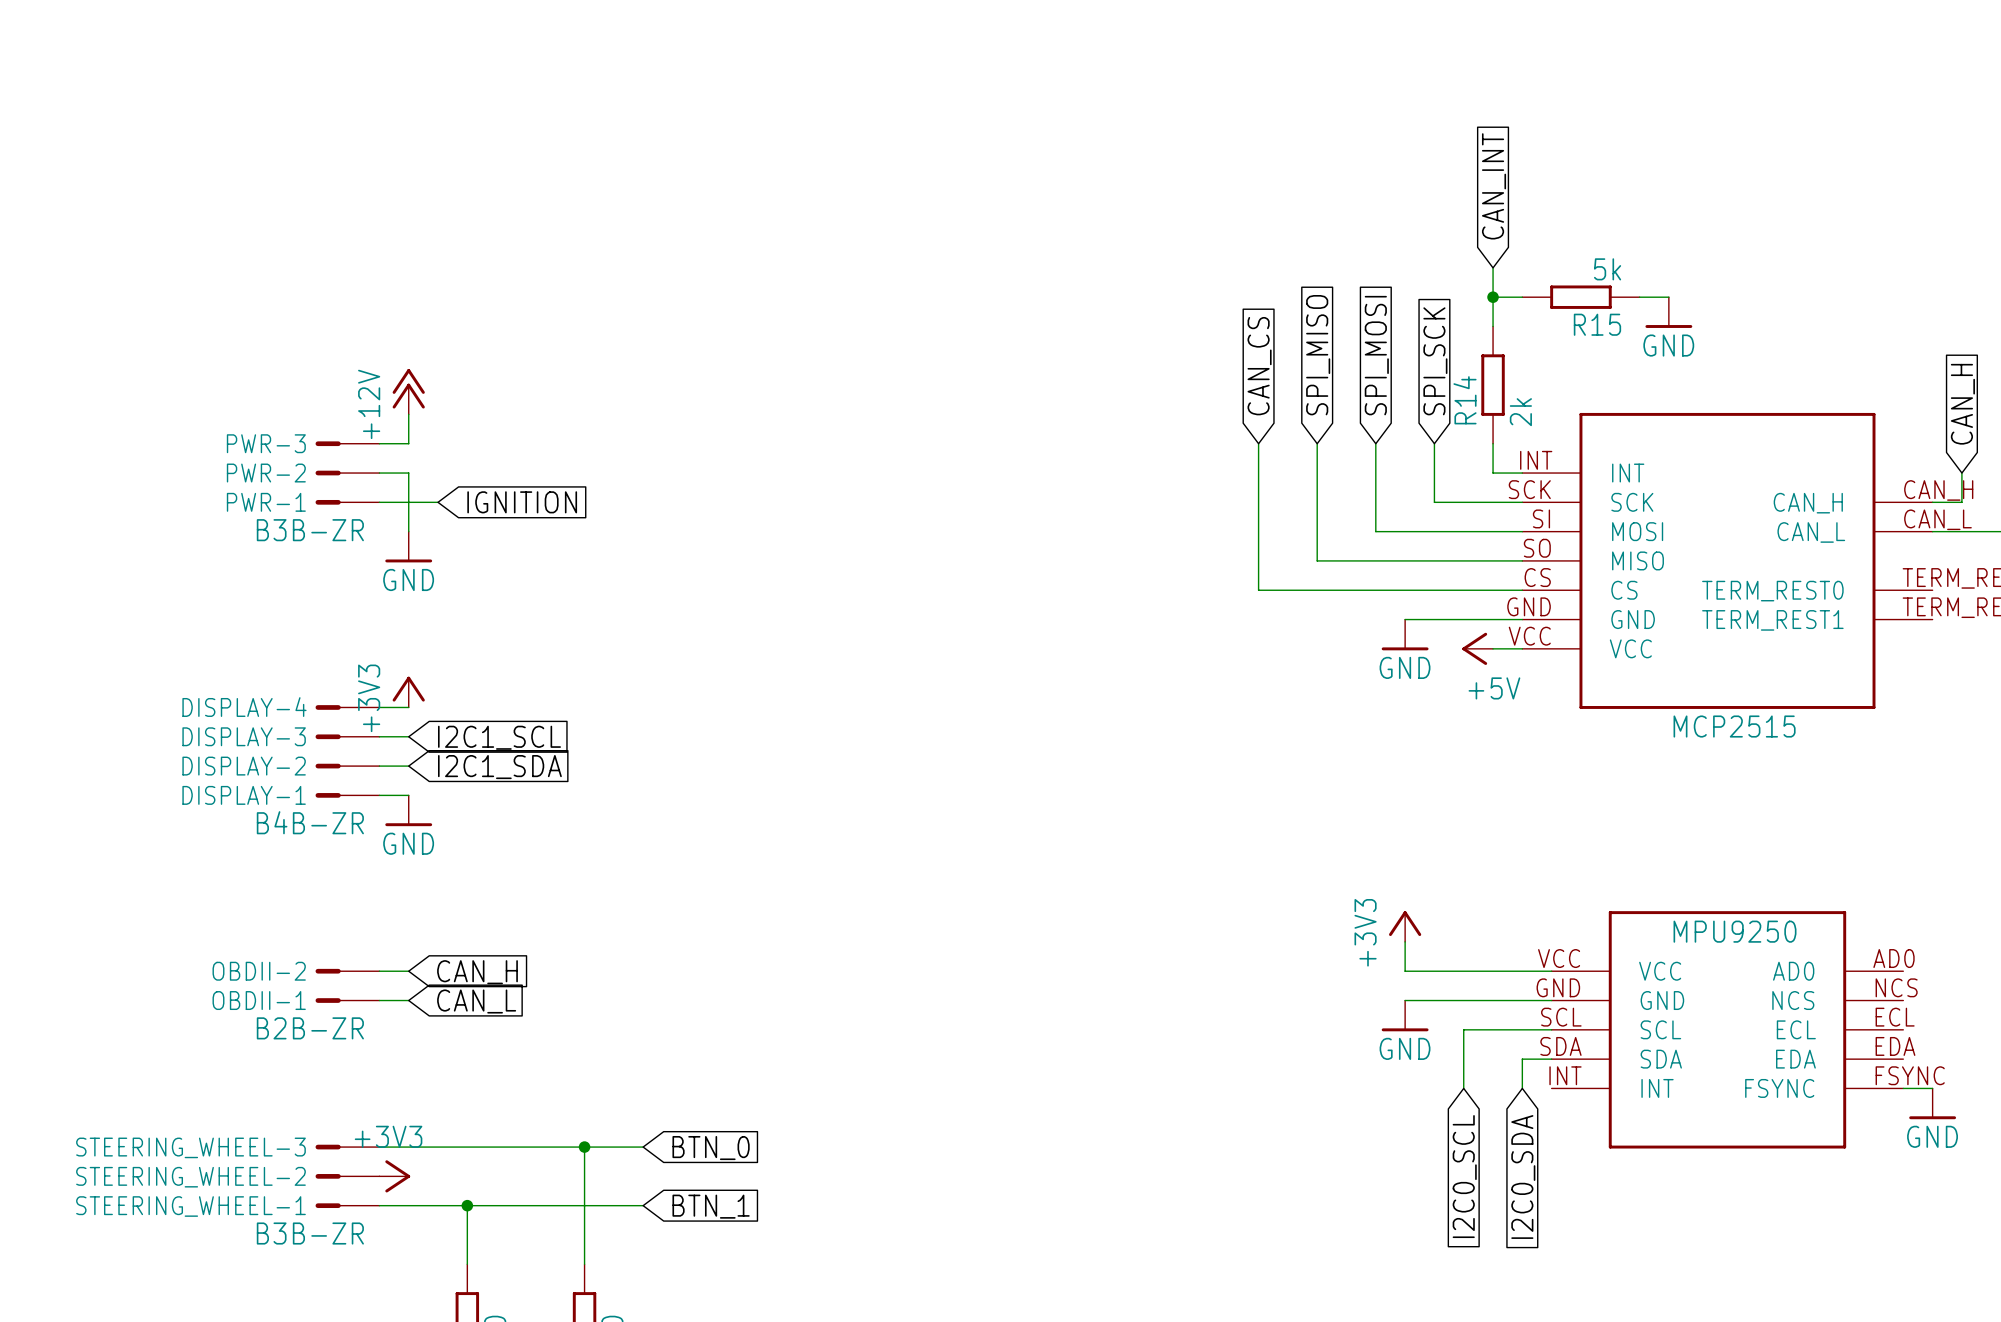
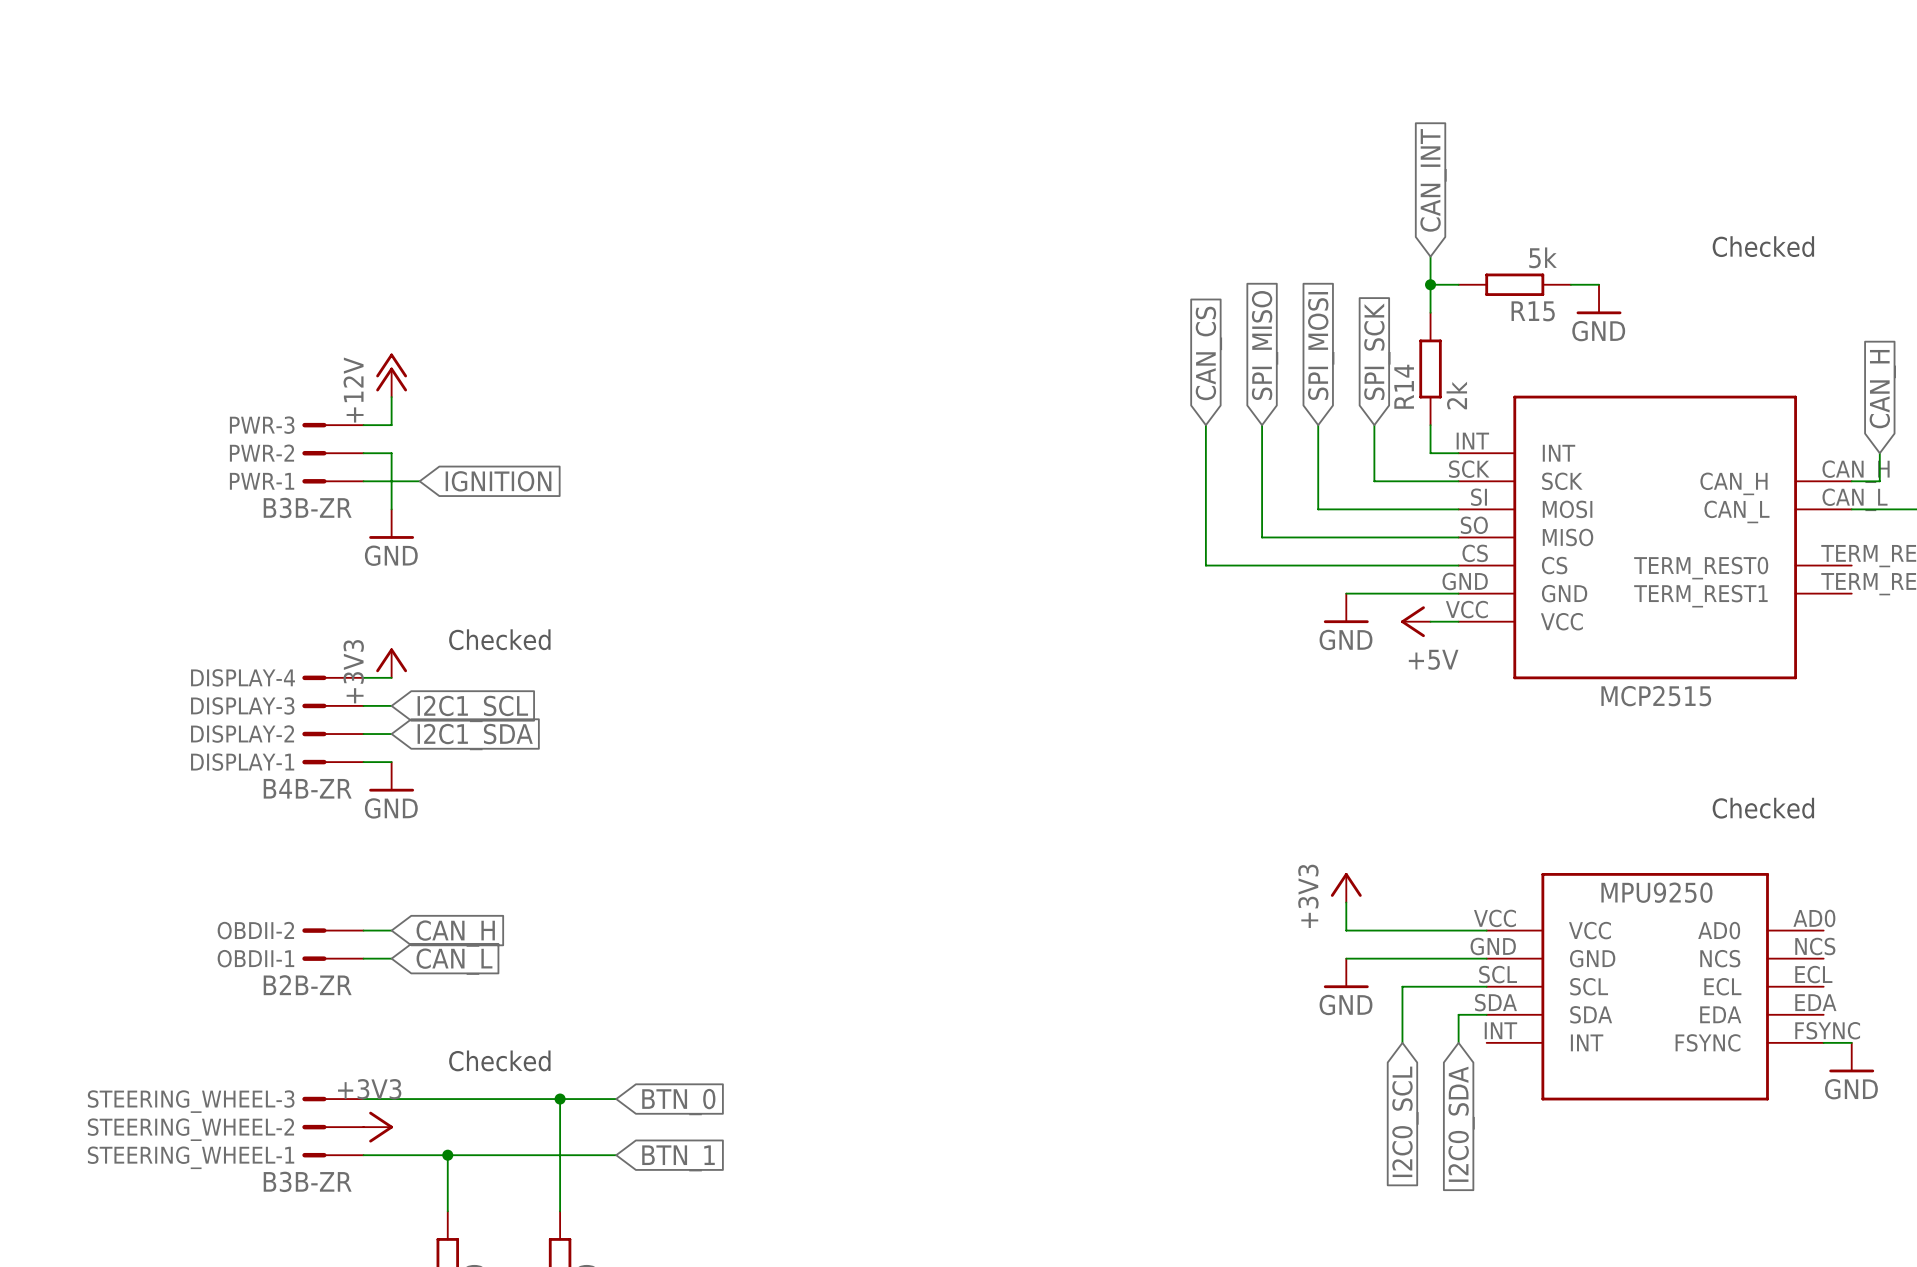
text: none -> Checked (1763, 246)
text: none -> Checked (499, 639)
text: none -> Checked (1763, 808)
text: none -> Checked (499, 1060)

